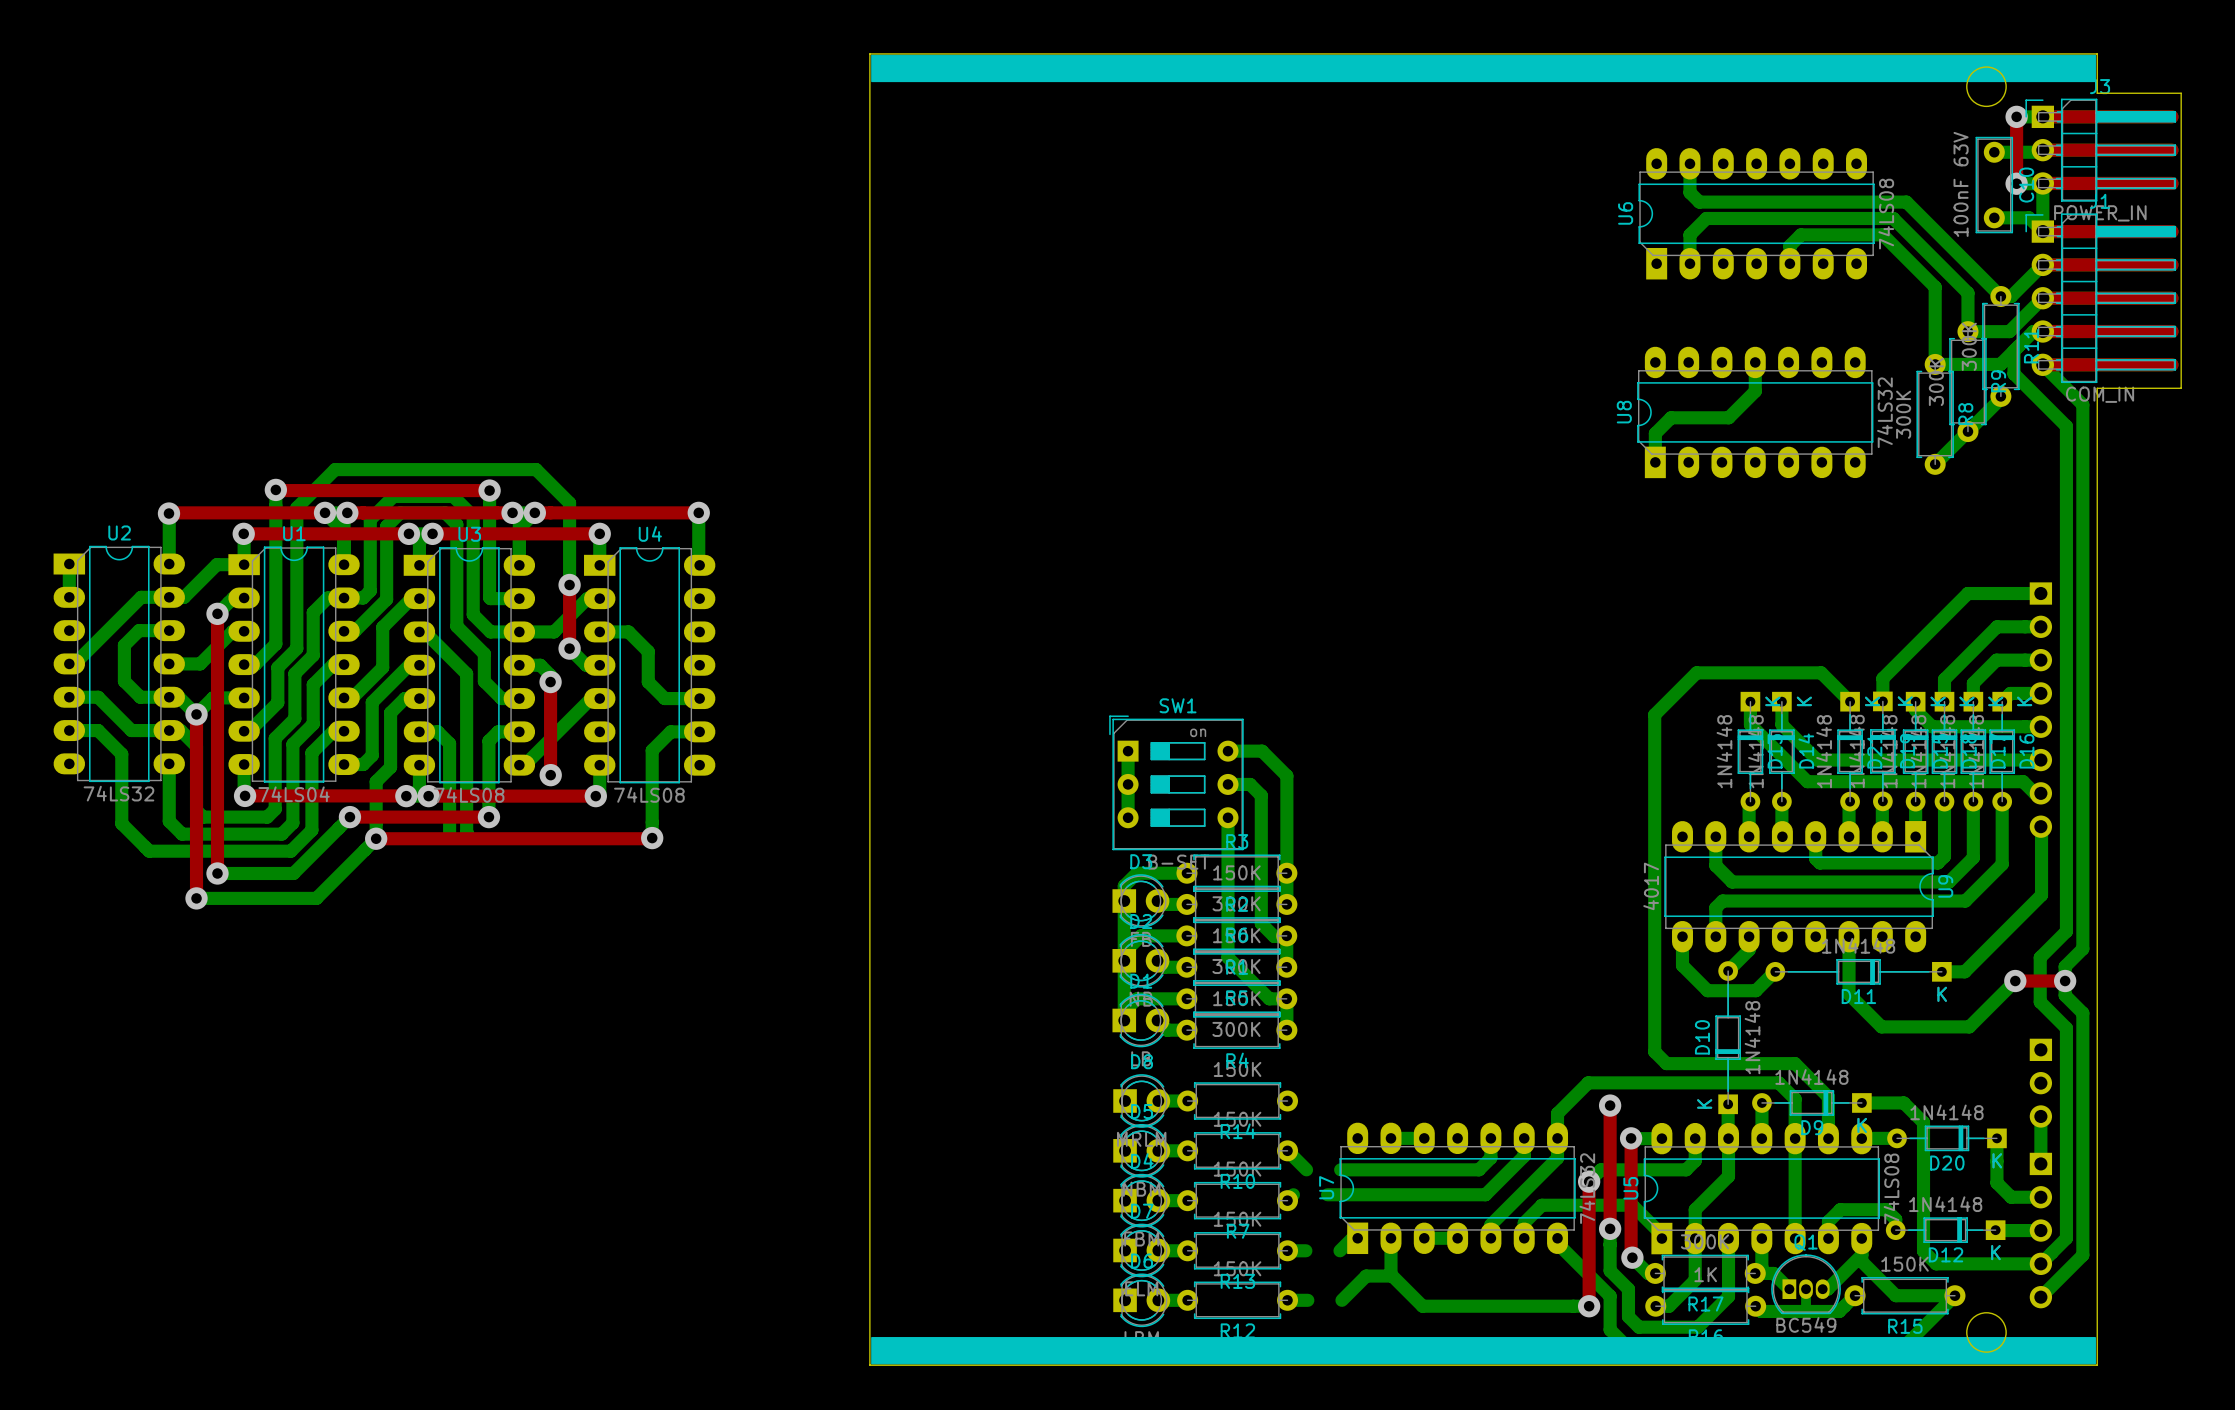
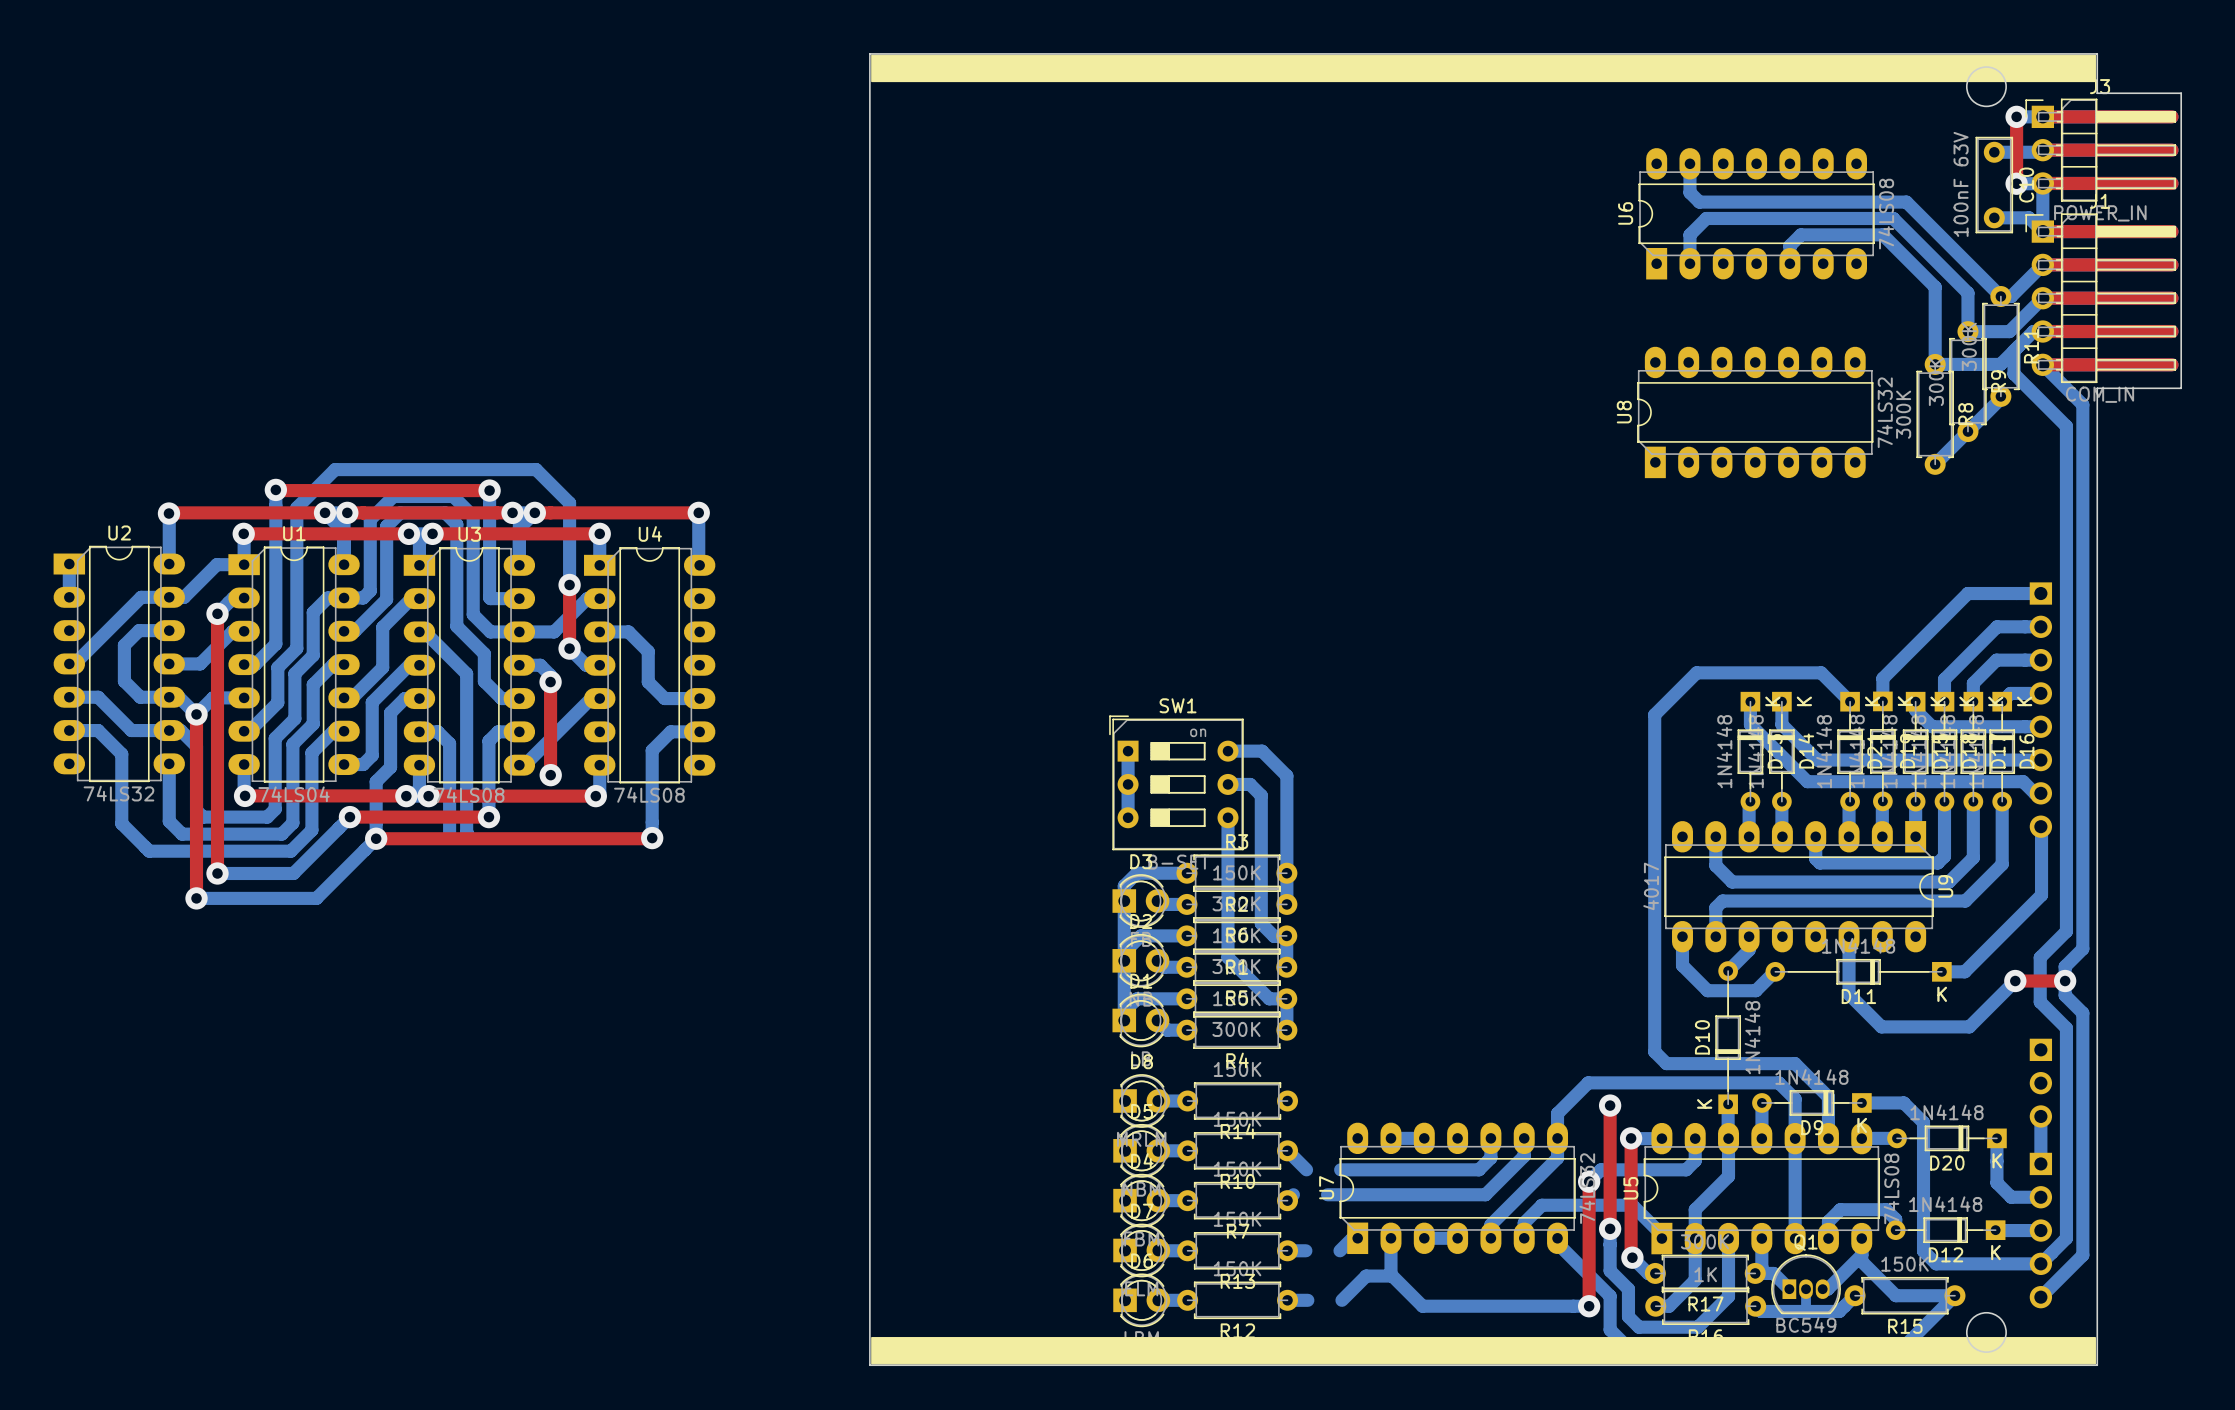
bottom track: (1755, 362) (1755, 391) (1728, 417) (1671, 417) (1655, 433) (1655, 462) -> none

